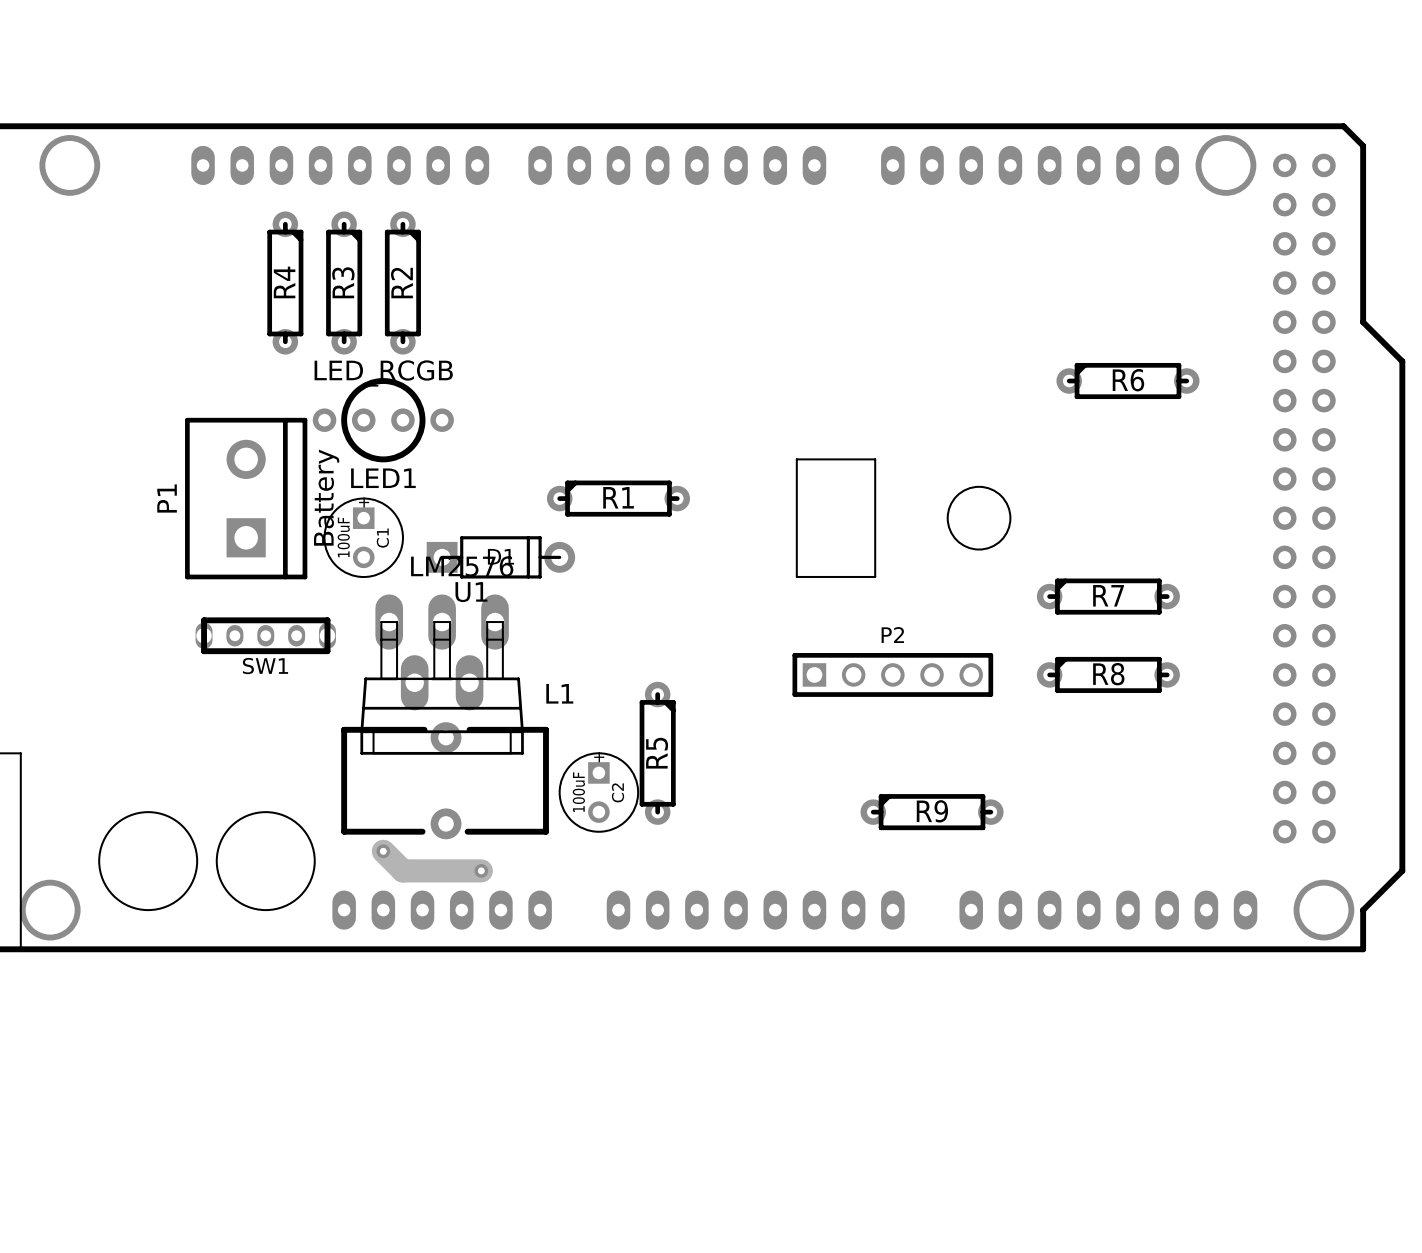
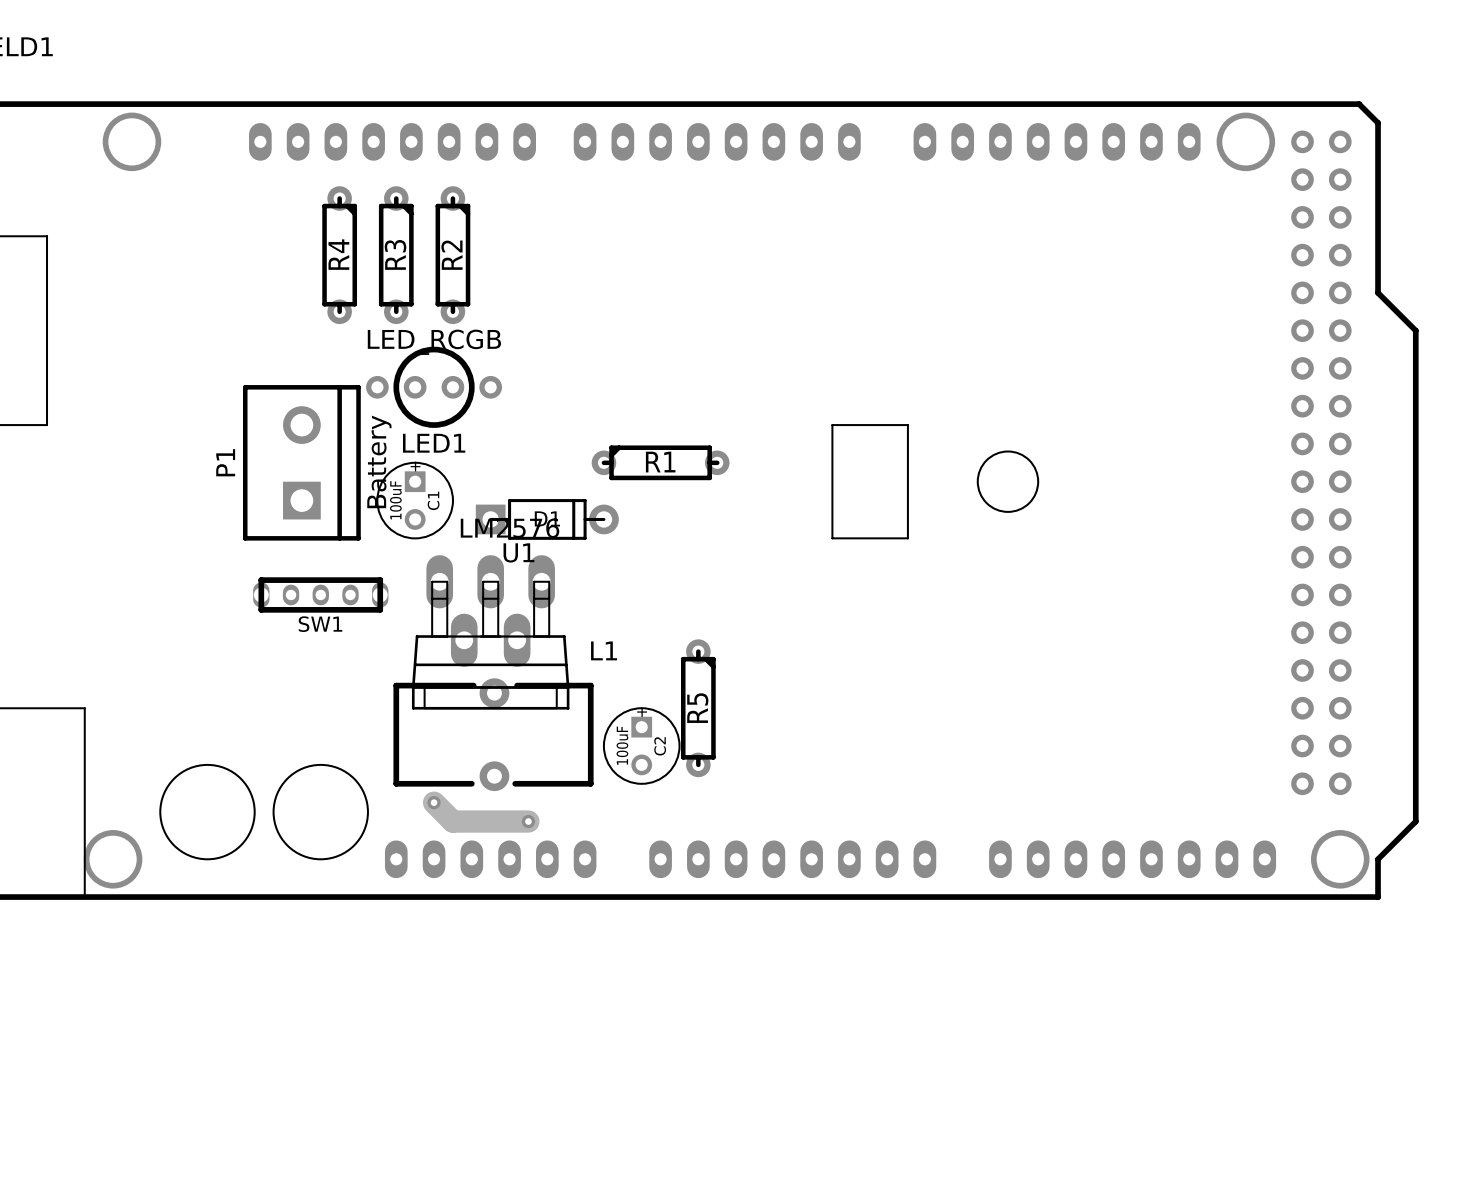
R6: (1127, 381) -> none
R7: (1108, 596) -> none
P2: (892, 674) -> none
R8: (1108, 674) -> none
R9: (932, 812) -> none

